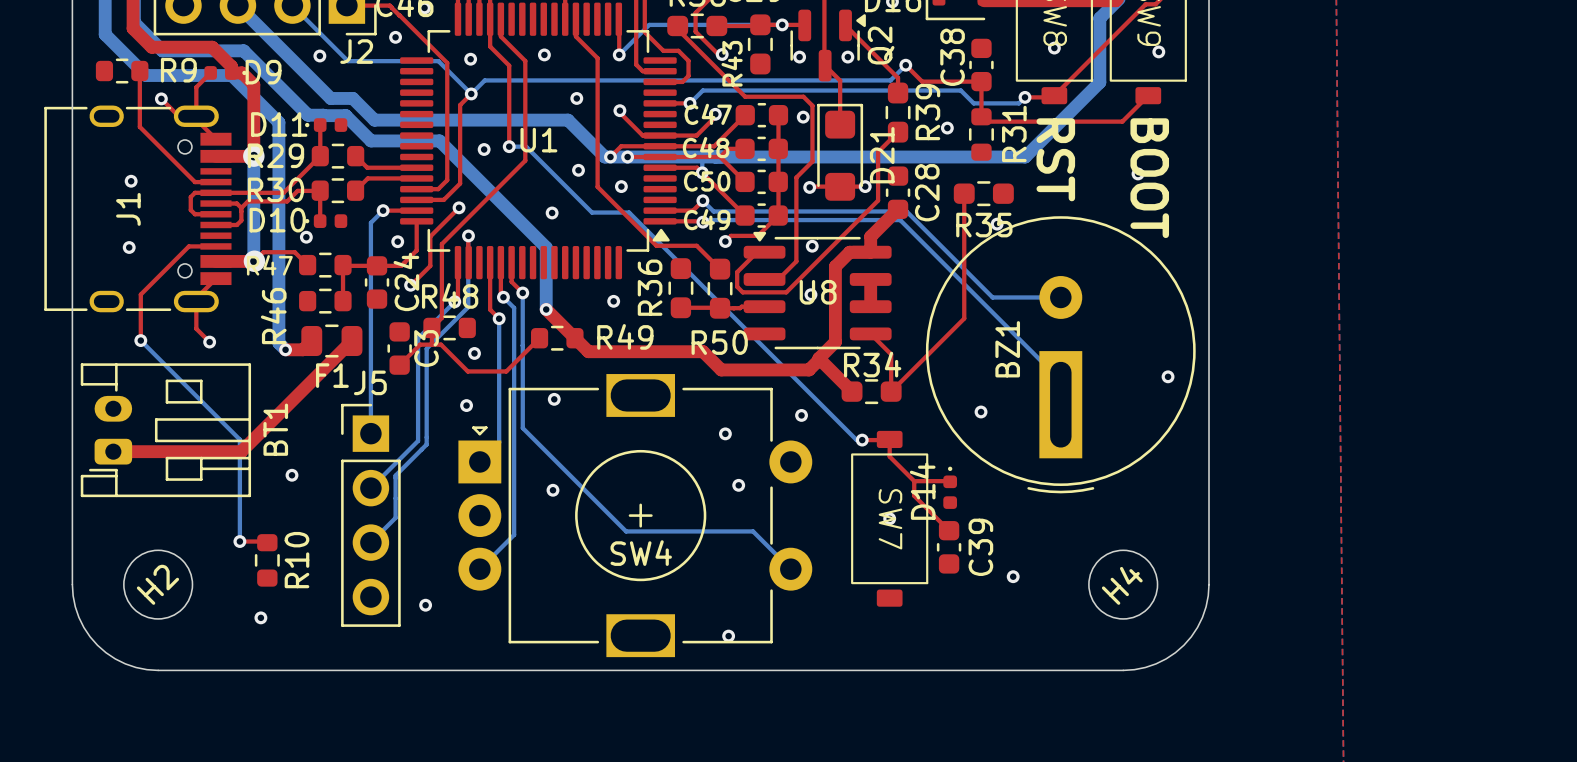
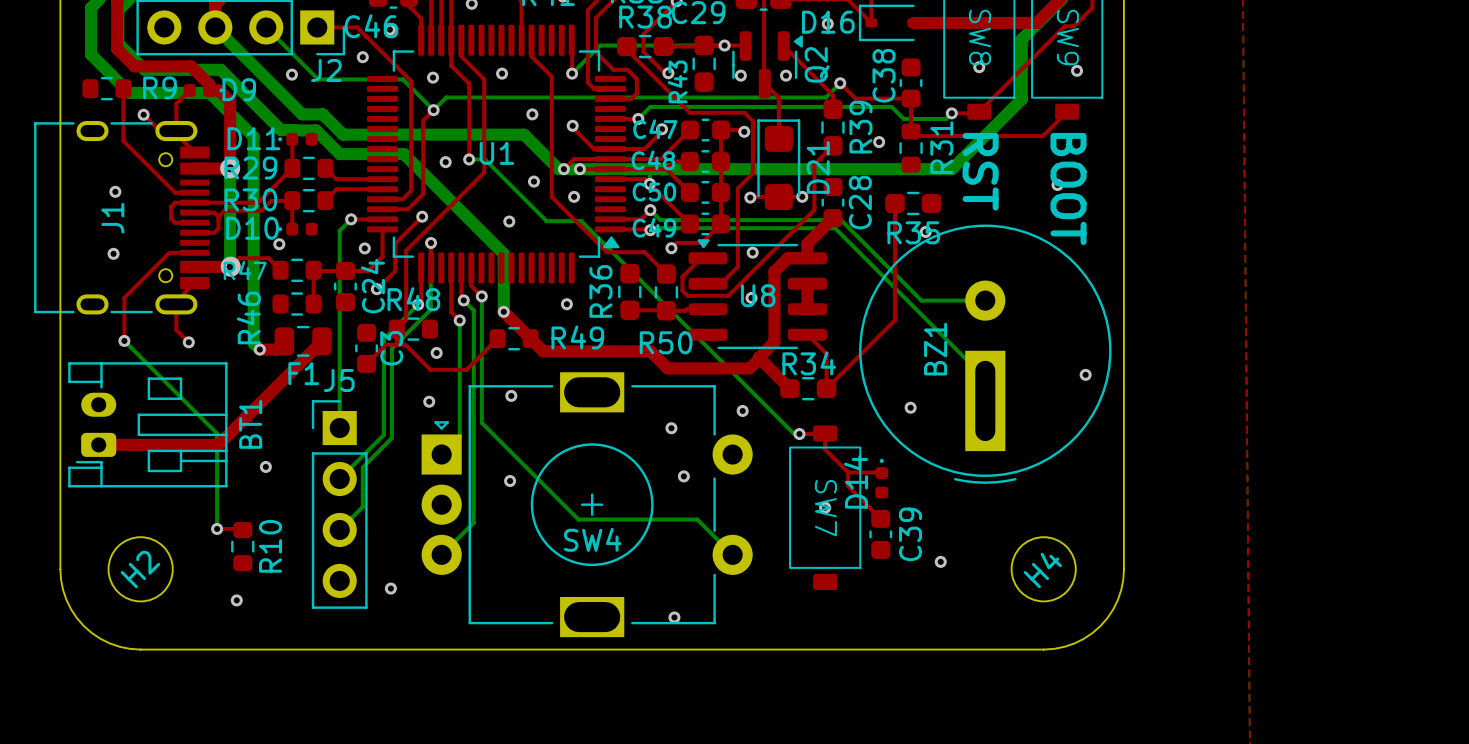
top track: none -> (721, 130) (739, 130)

